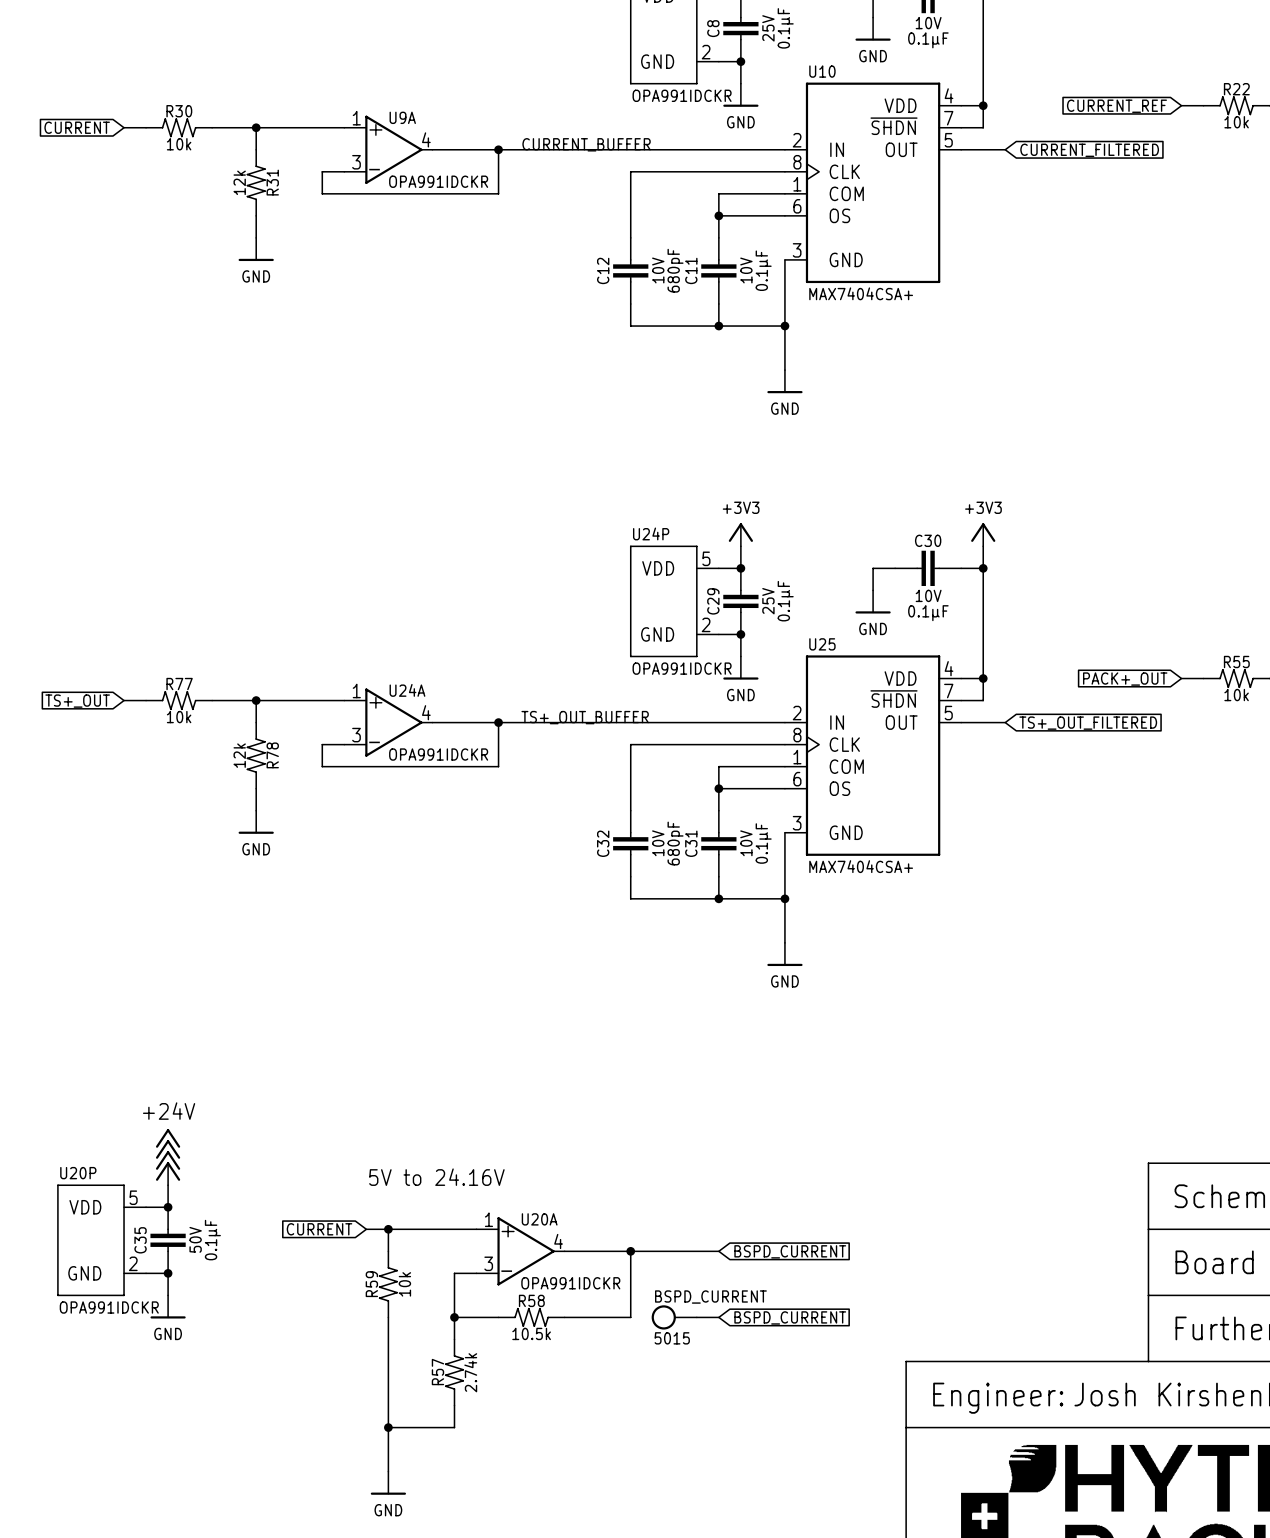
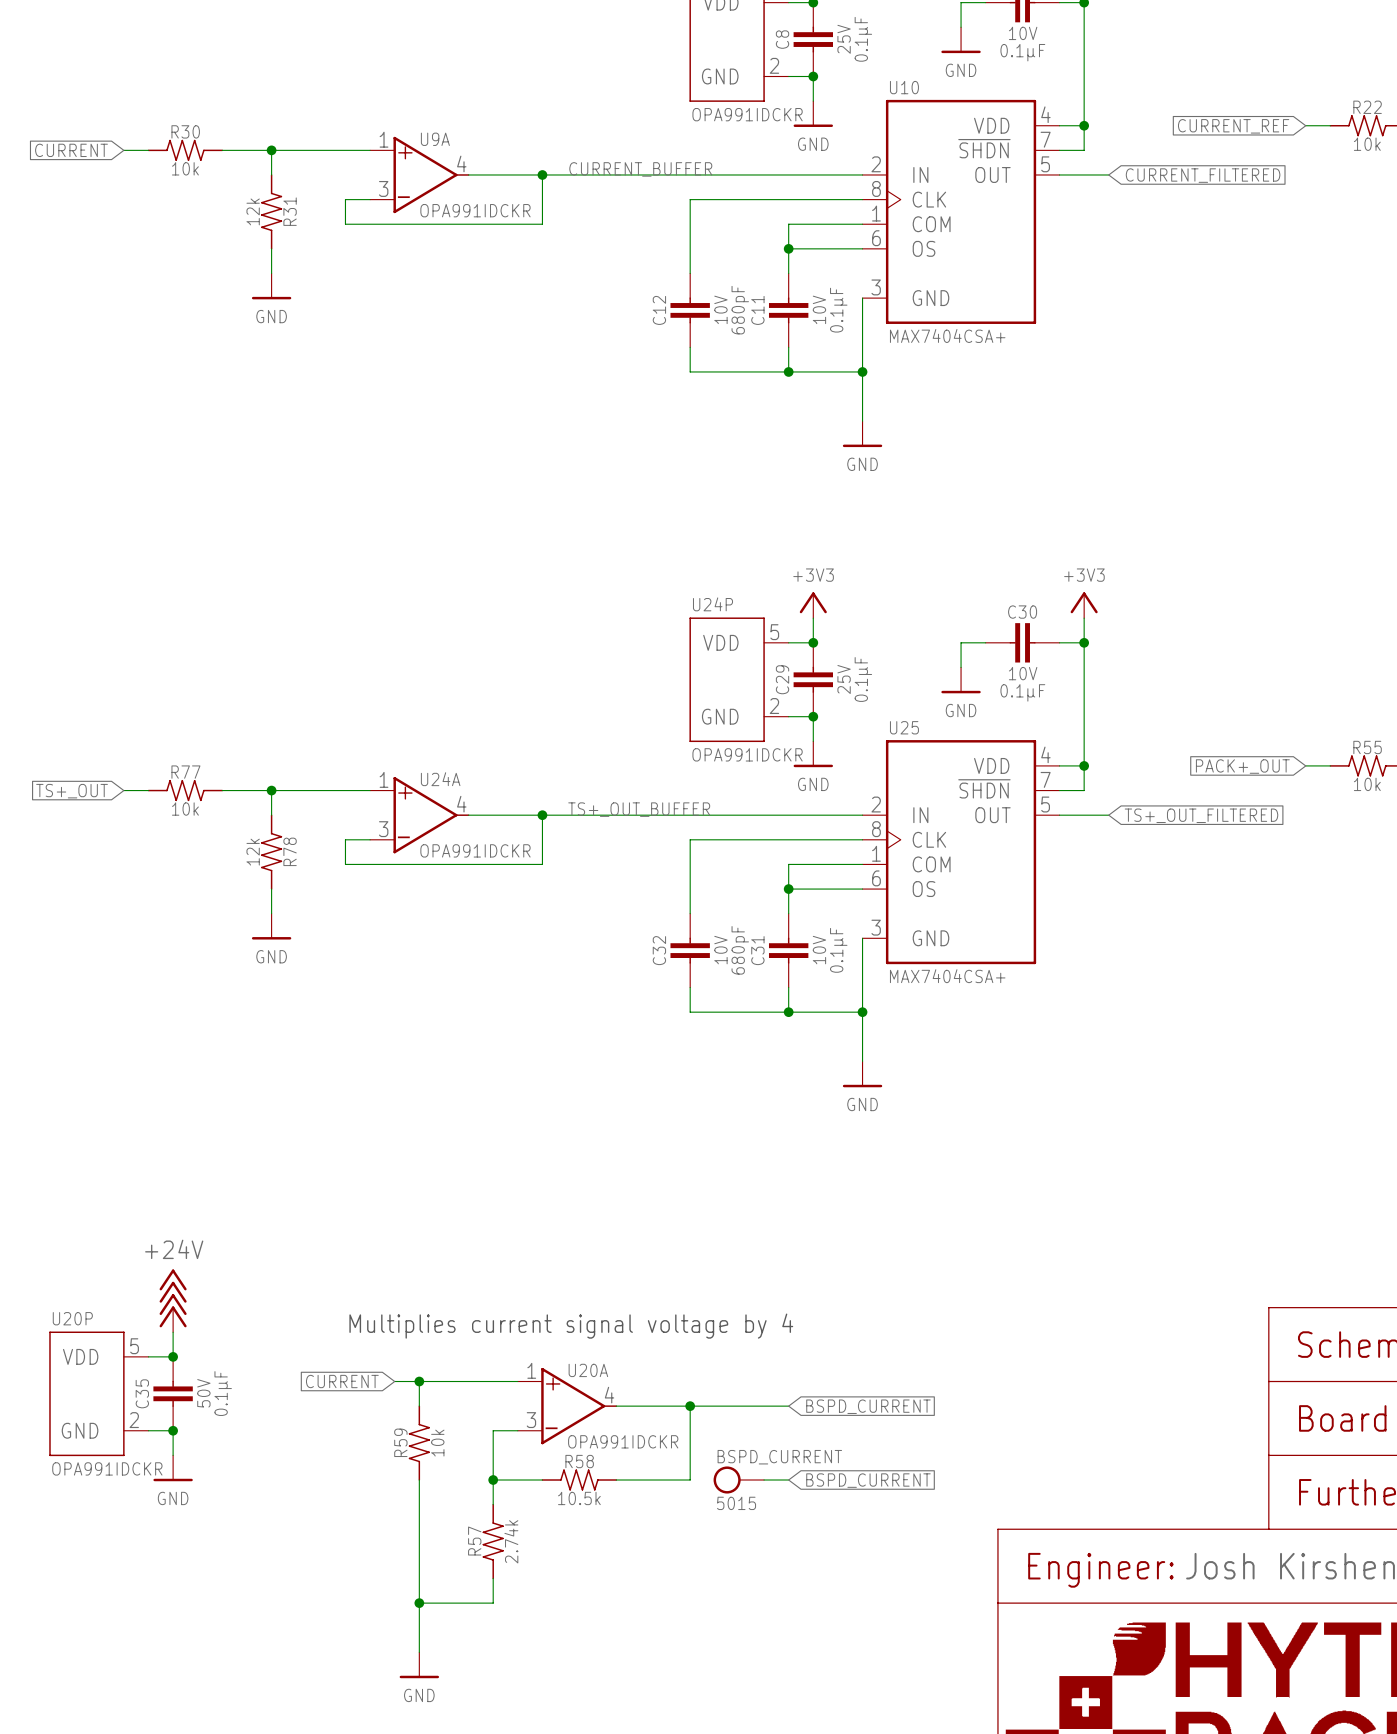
text: 5V to 24.16V (436, 1177) -> none
text: none -> Multiplies current signal voltage by 4 (571, 1326)

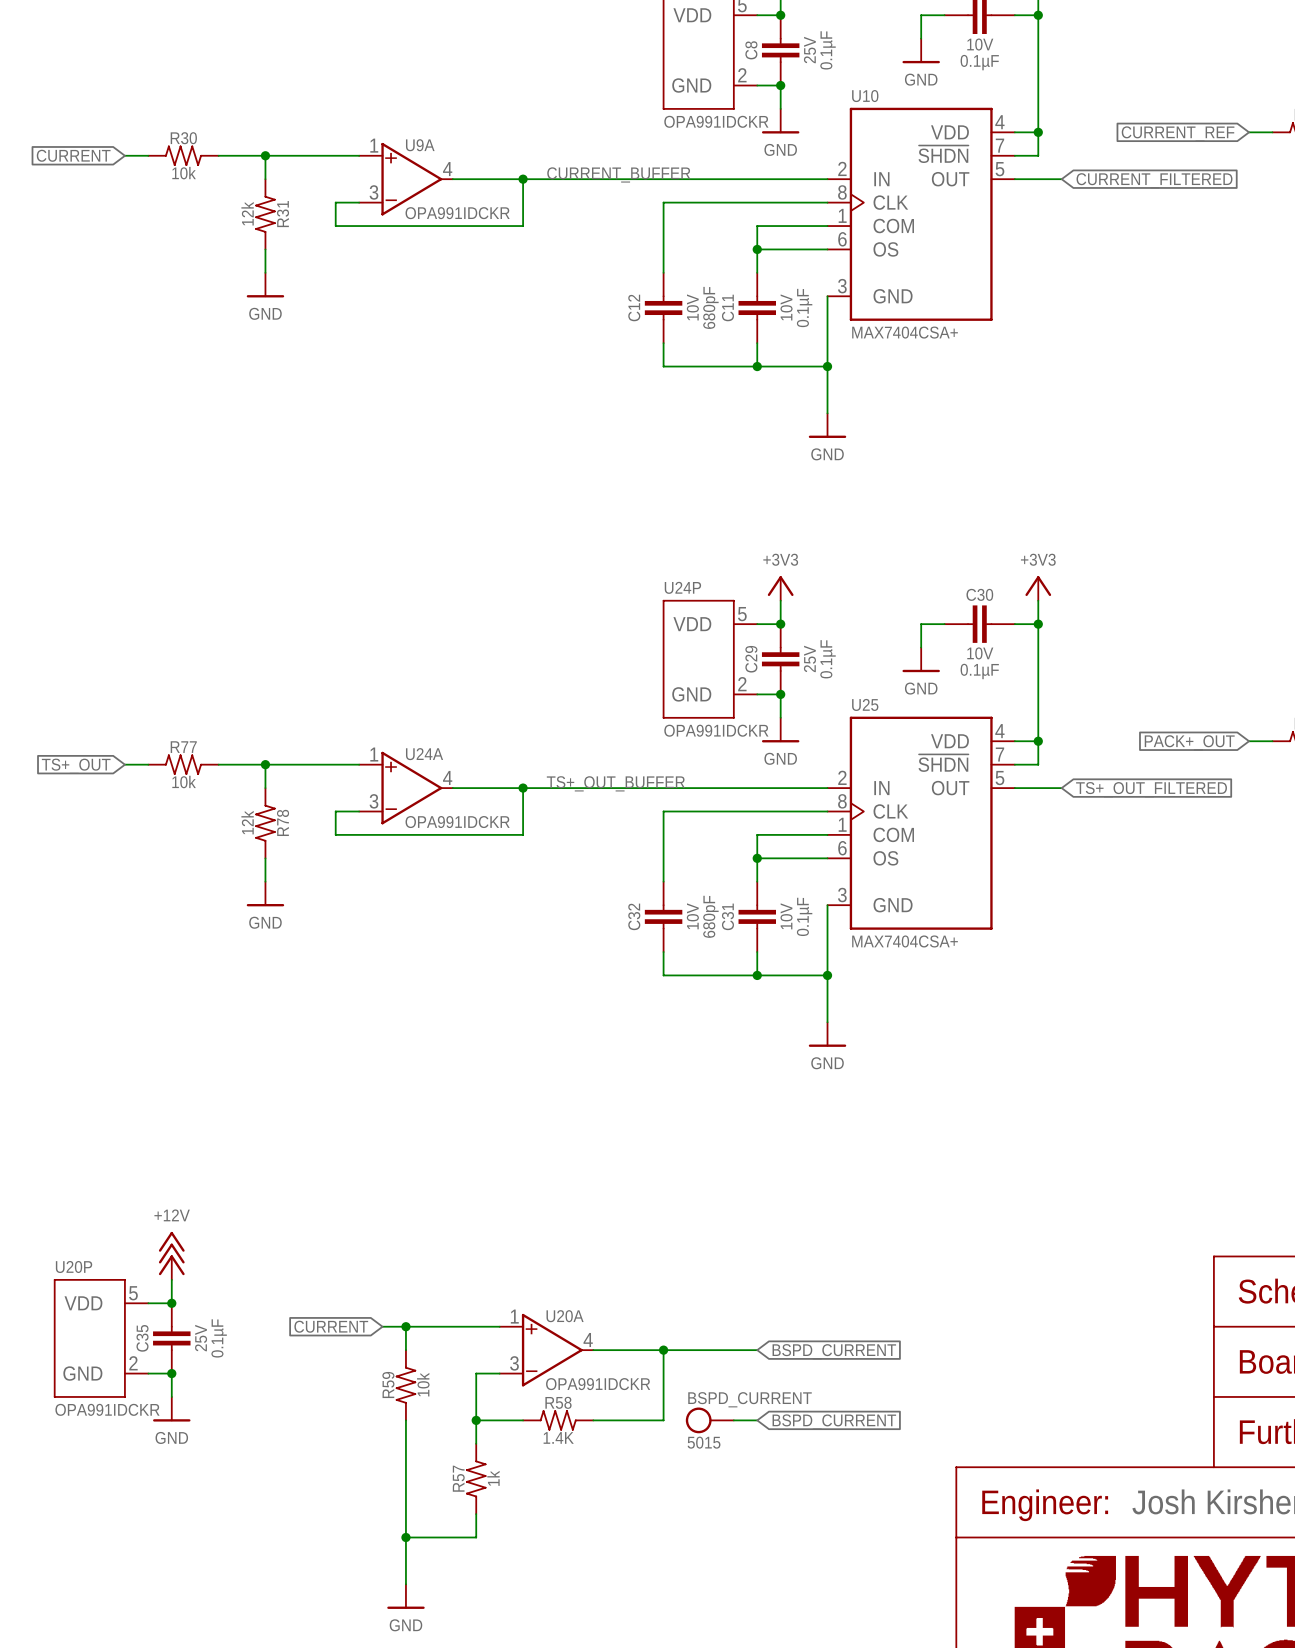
power symbol: +24V (173, 1300) -> +12V (171, 1255)
text: Multiplies current signal voltage by 4 (571, 1326) -> none
C35 text: 50V (203, 1393) -> 25V (201, 1338)
R58 text: 10.5k (579, 1498) -> 1.4K (558, 1437)
R57 text: 2.74k (511, 1541) -> 1k (493, 1478)

